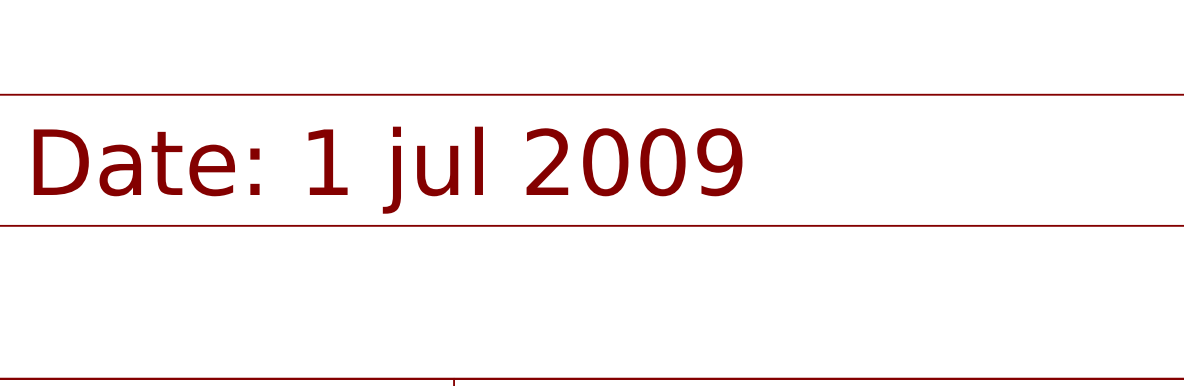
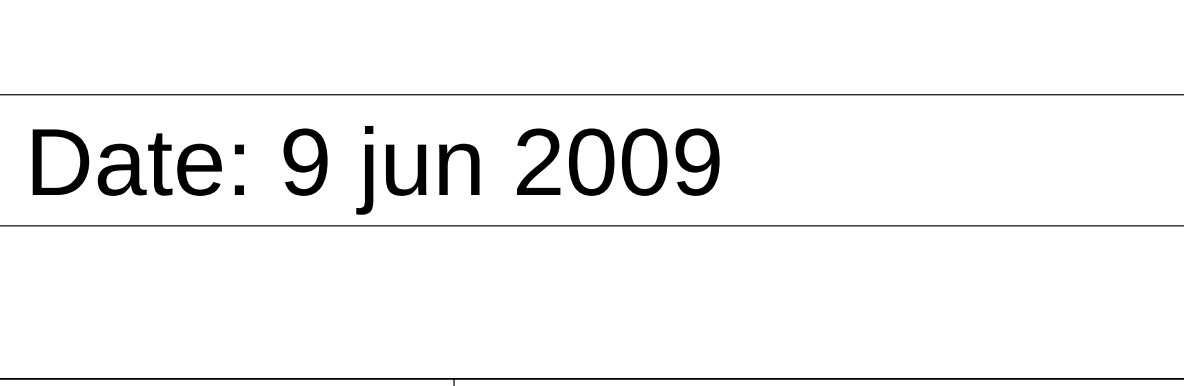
title block: Date: 1 jul 2009 (388, 170) -> Date: 9 jun 2009 (376, 170)

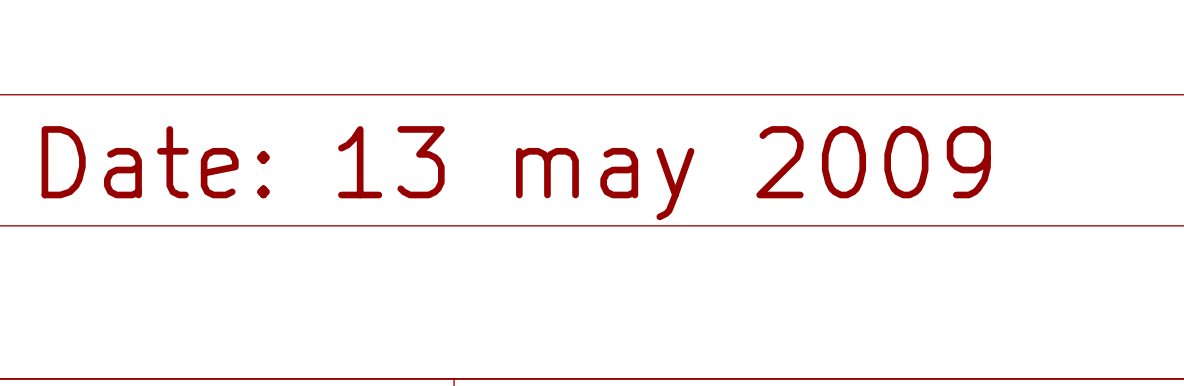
title block: Date: 9 jun 2009 (376, 170) -> Date: 13 may 2009 (516, 173)

